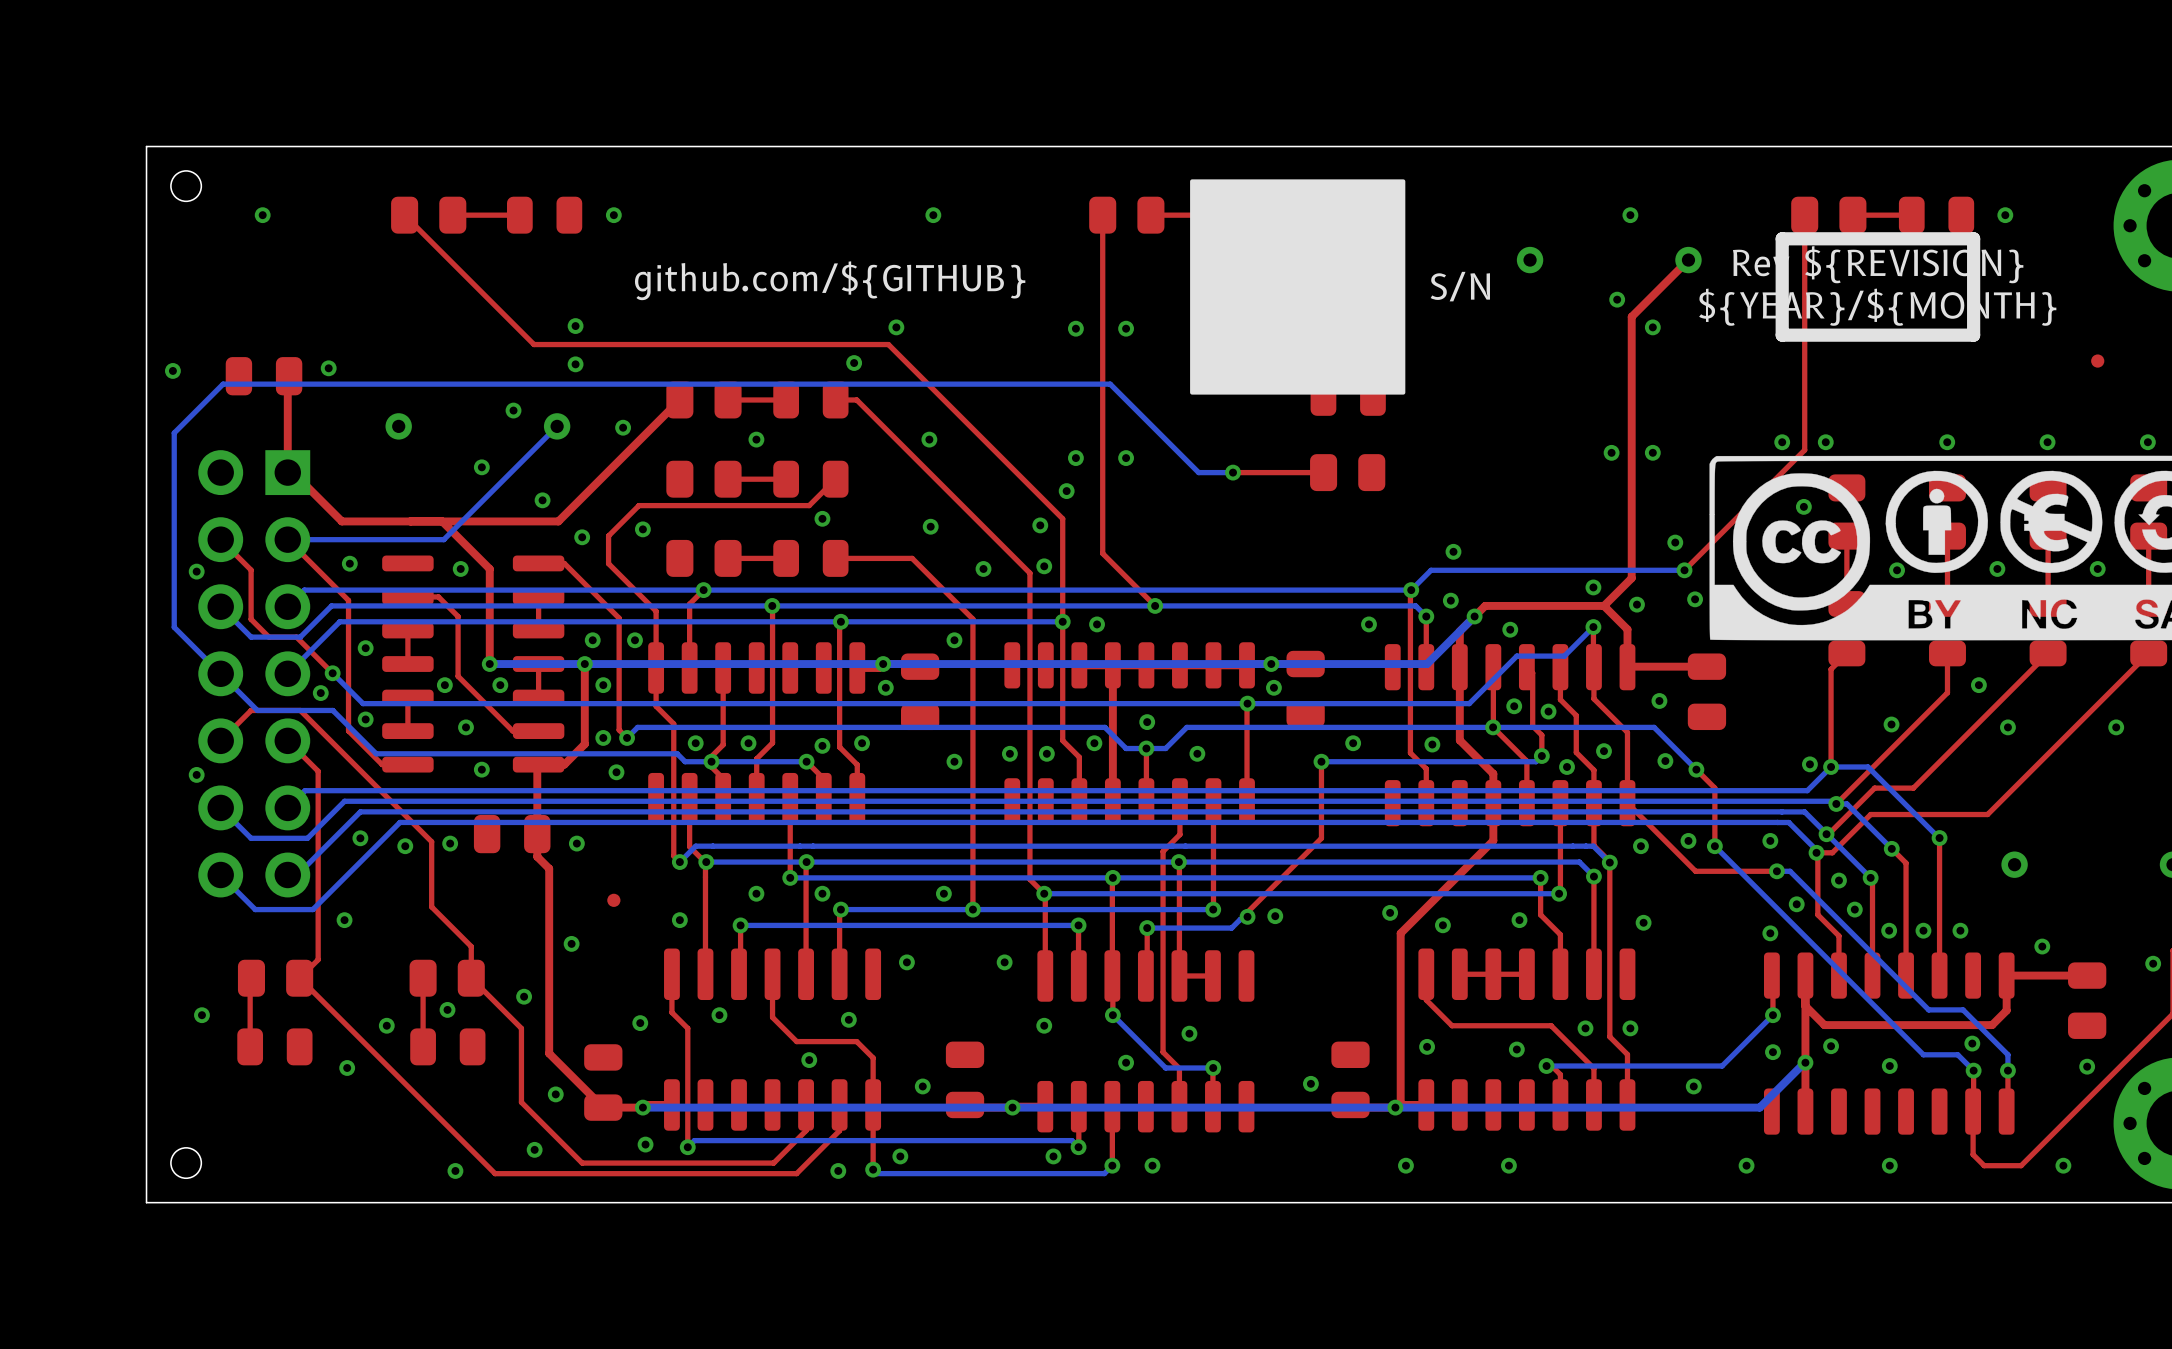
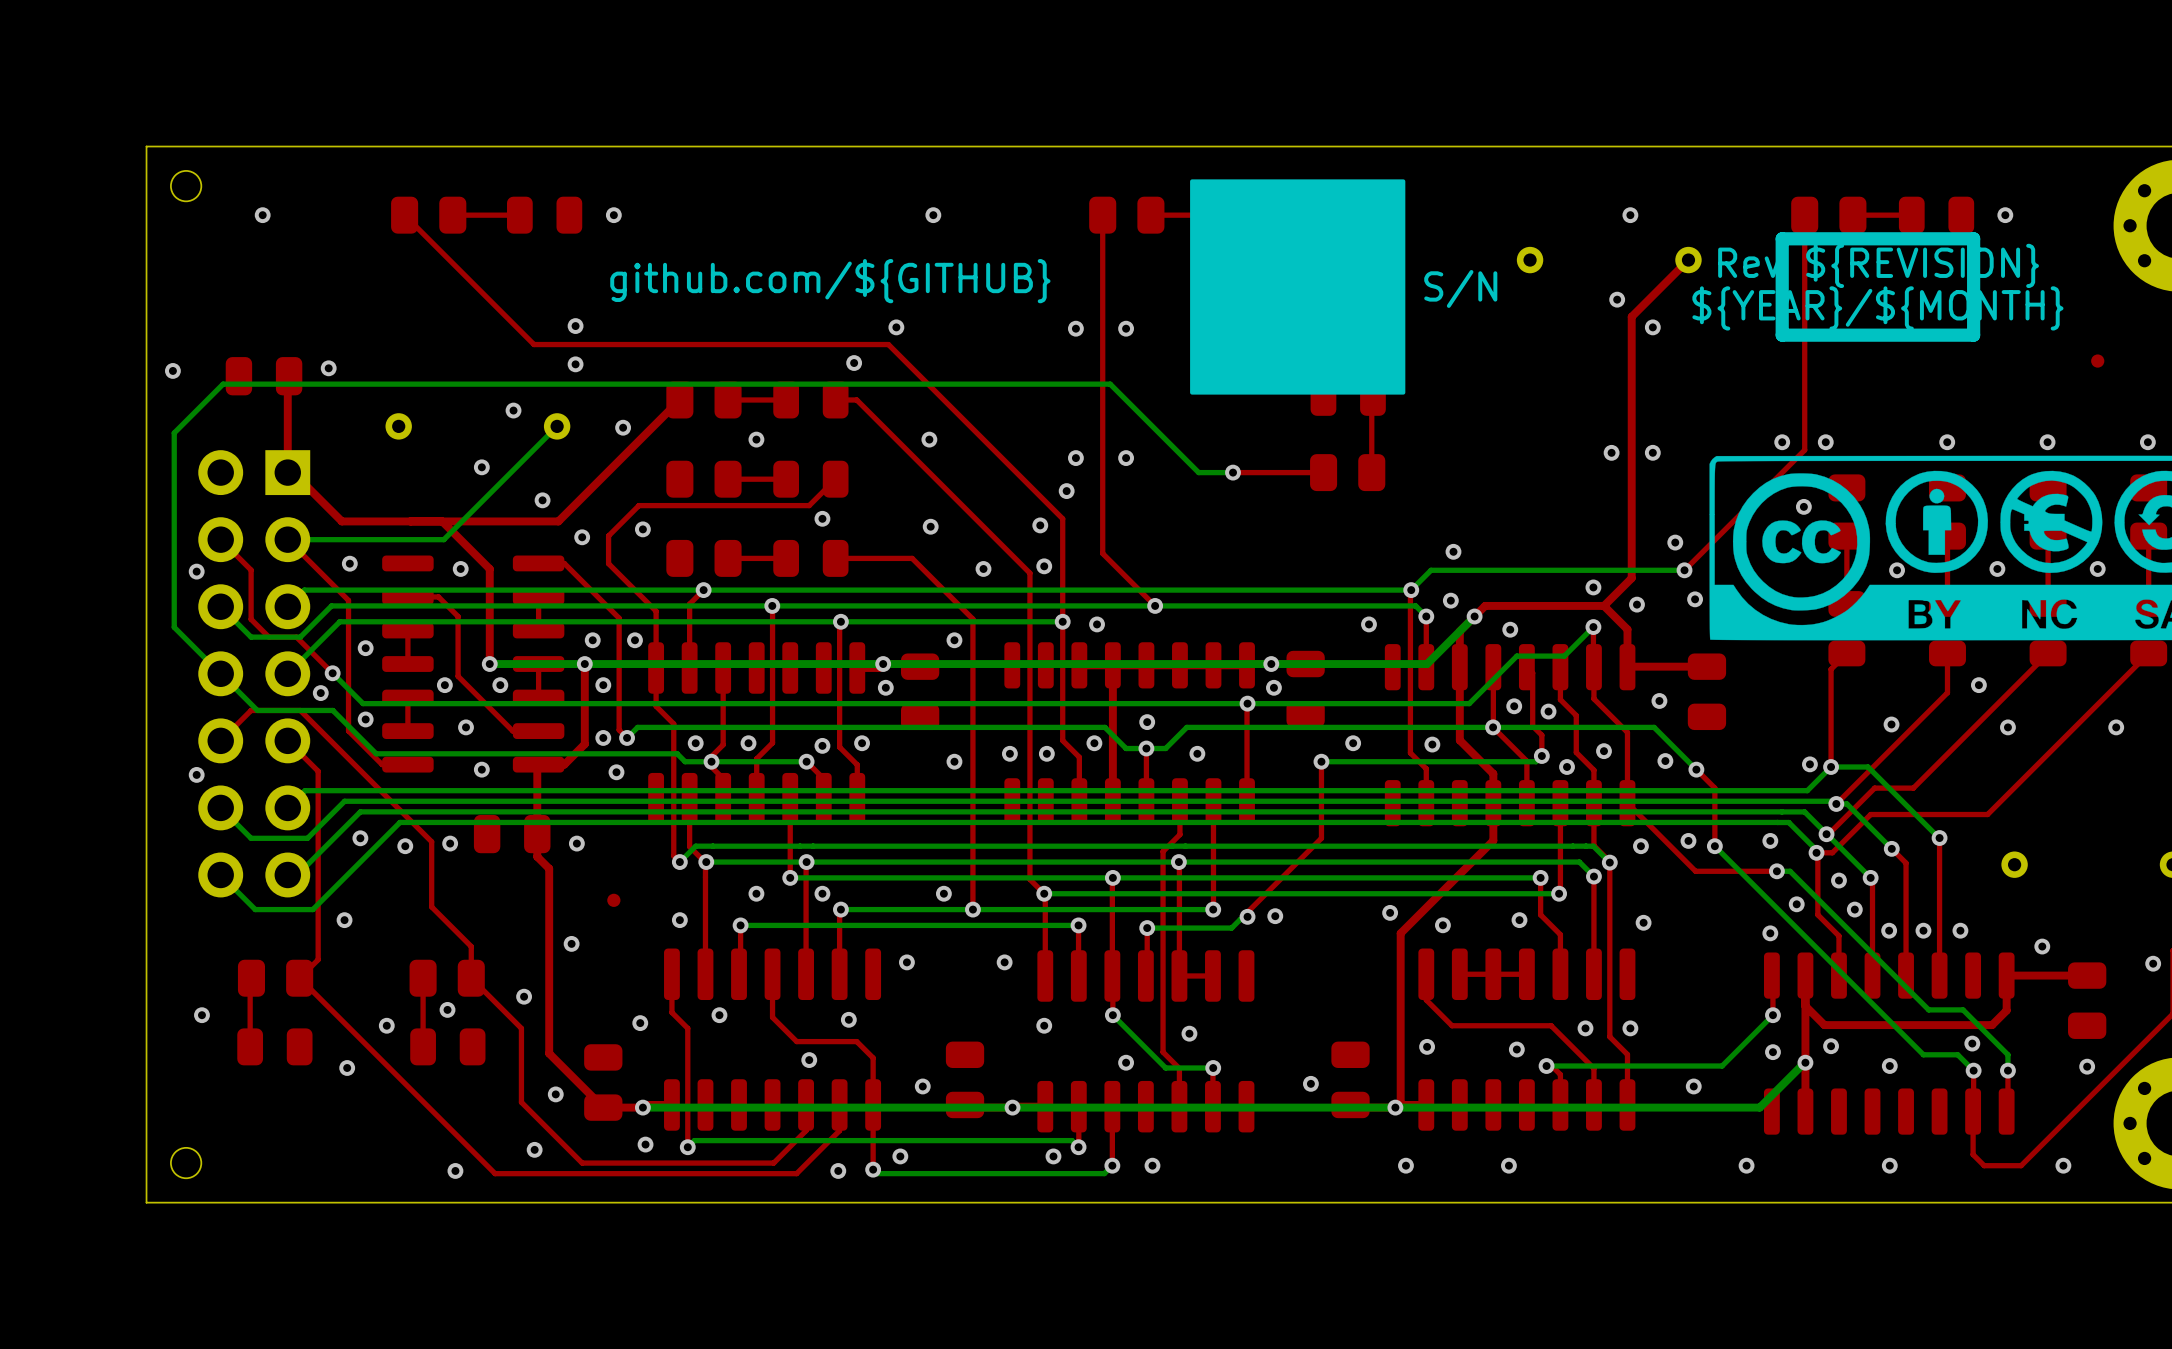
top track: none -> (1371, 398) (1371, 472)

